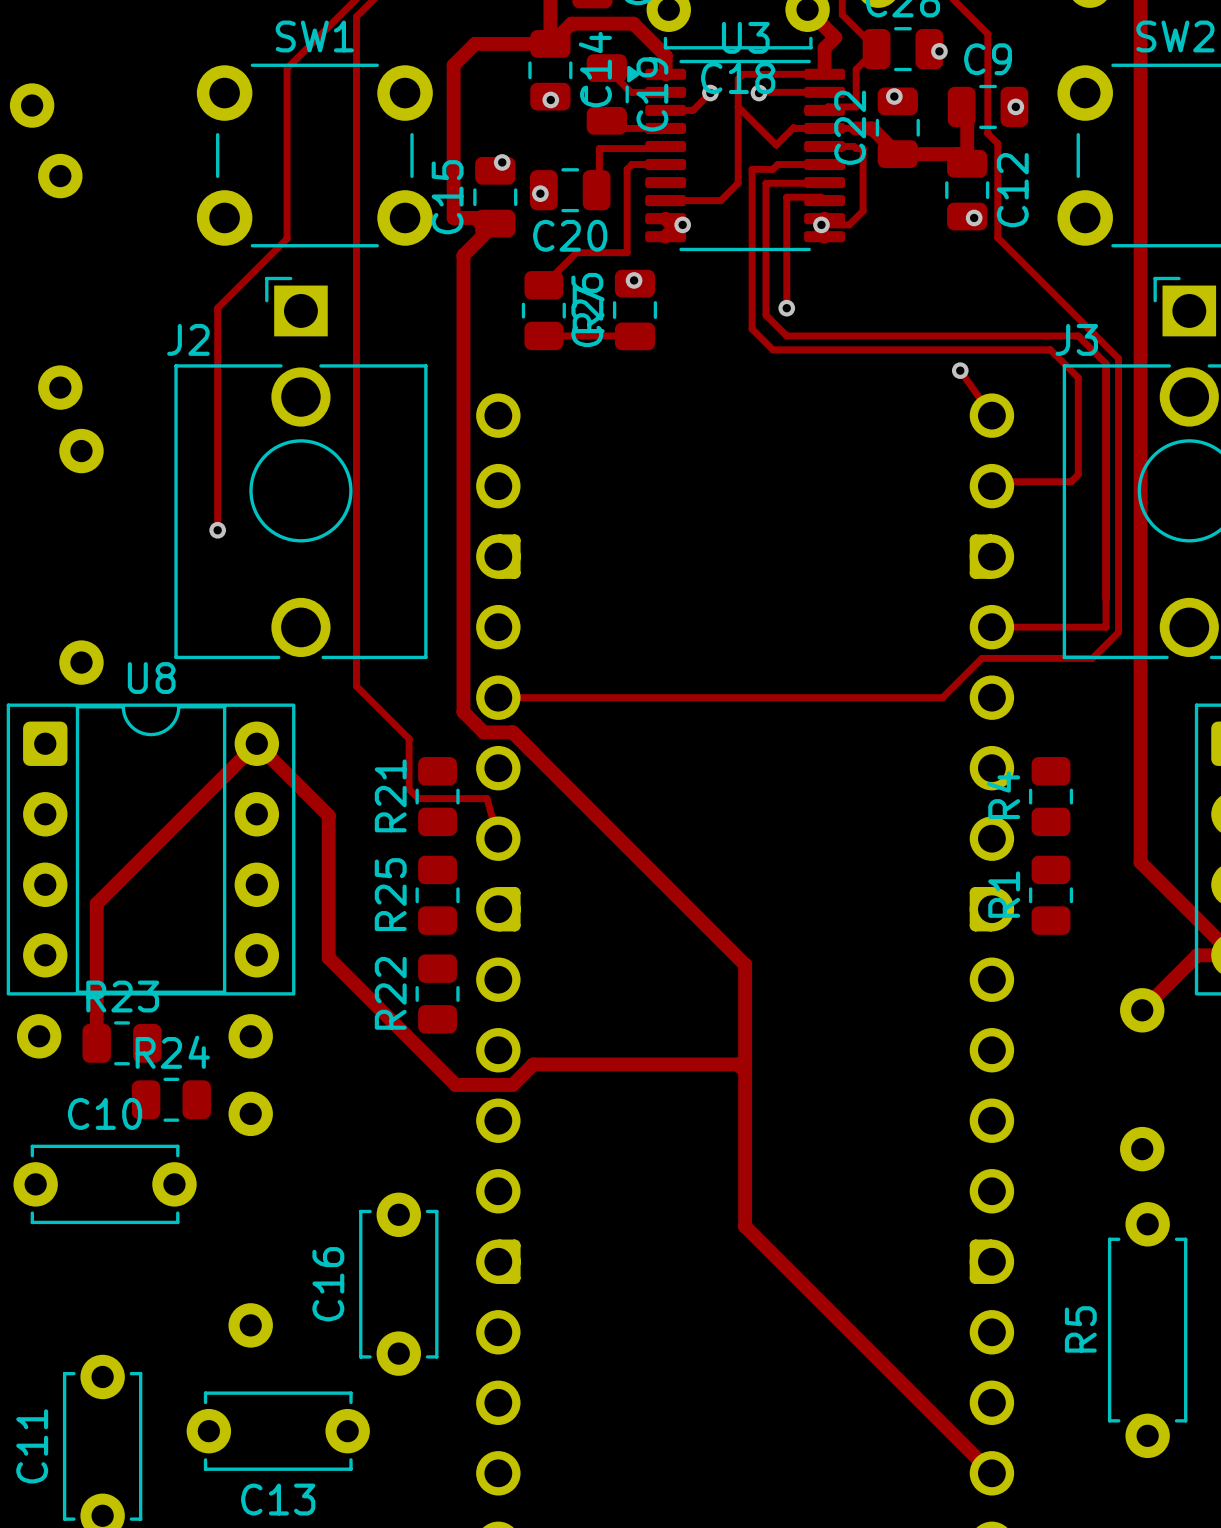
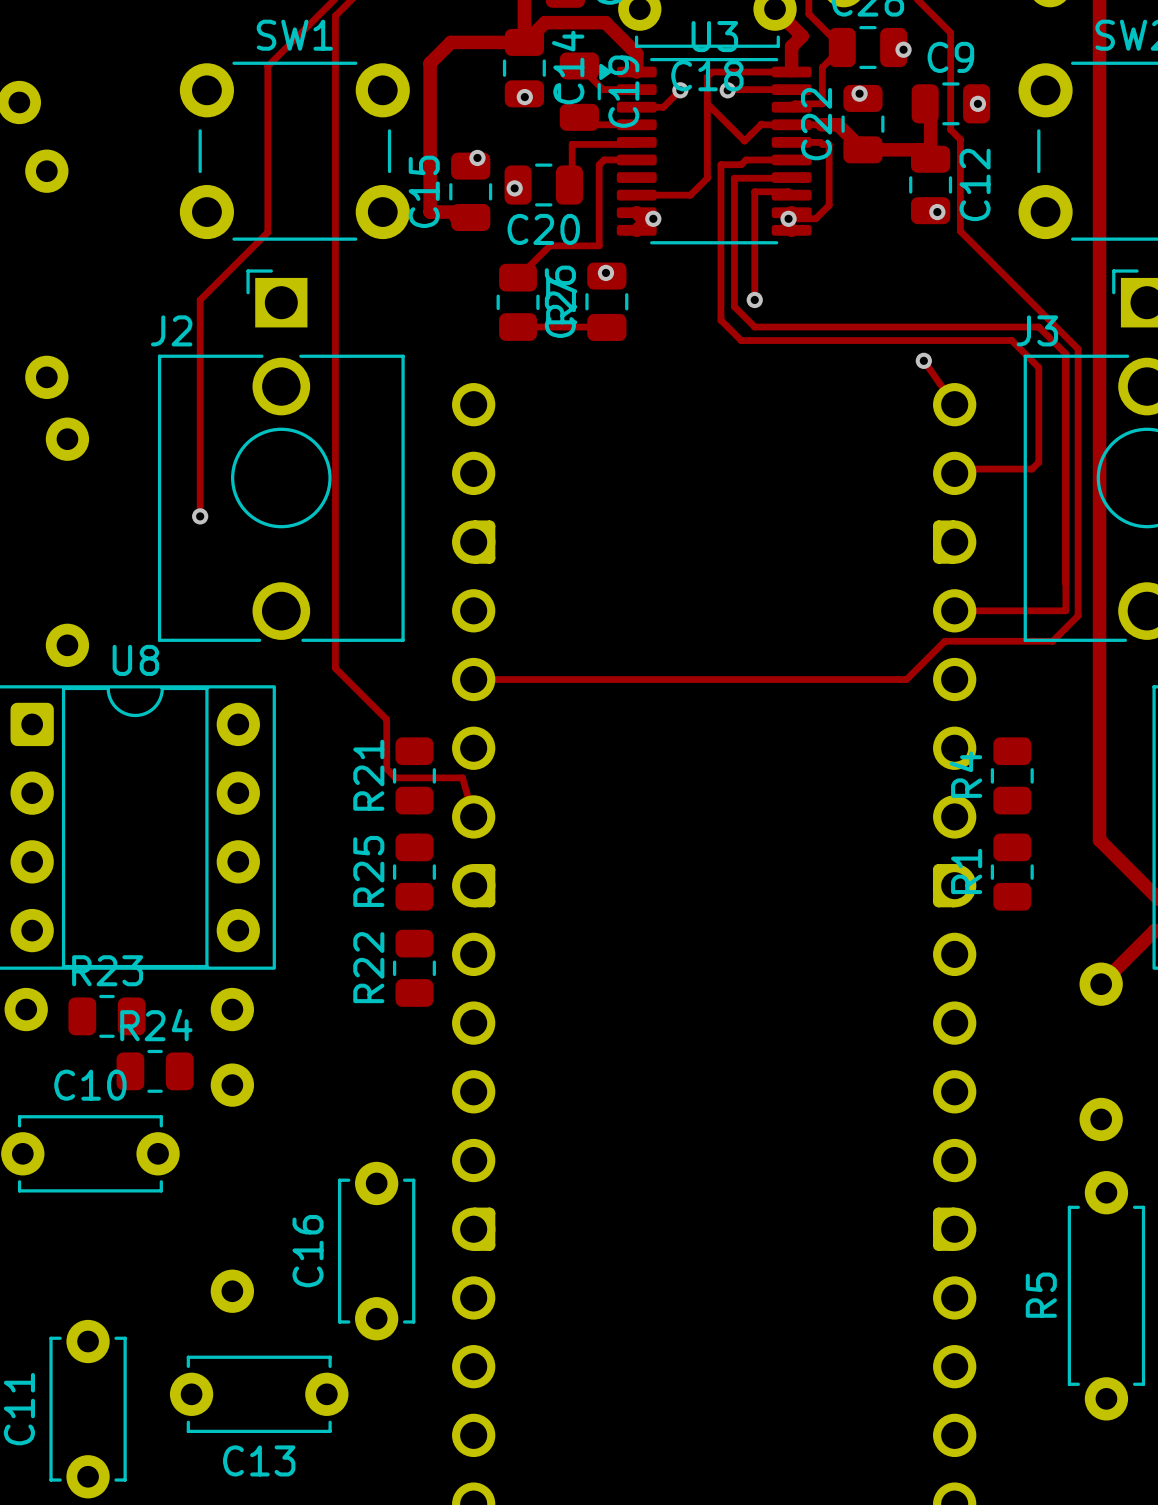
track: (495, 223) (463, 255) (463, 711) (483, 732) (512, 732) (745, 964) (745, 1226) (991, 1473) -> none
track: (96, 1043) (96, 903) (256, 743) (328, 815) (328, 957) (455, 1084) (512, 1084) (533, 1064) (738, 1064) (745, 1071) -> none

